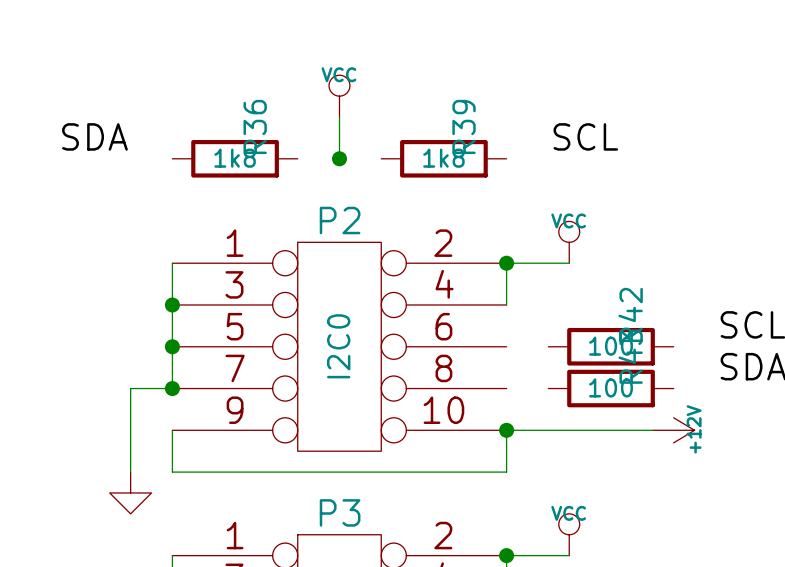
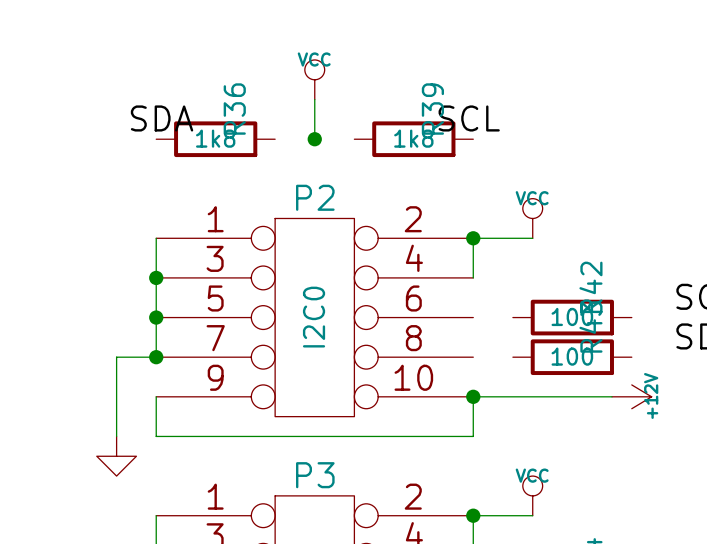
label position: SDA (94, 136) -> SDA (162, 118)
label position: SCL (585, 136) -> SCL (469, 118)

